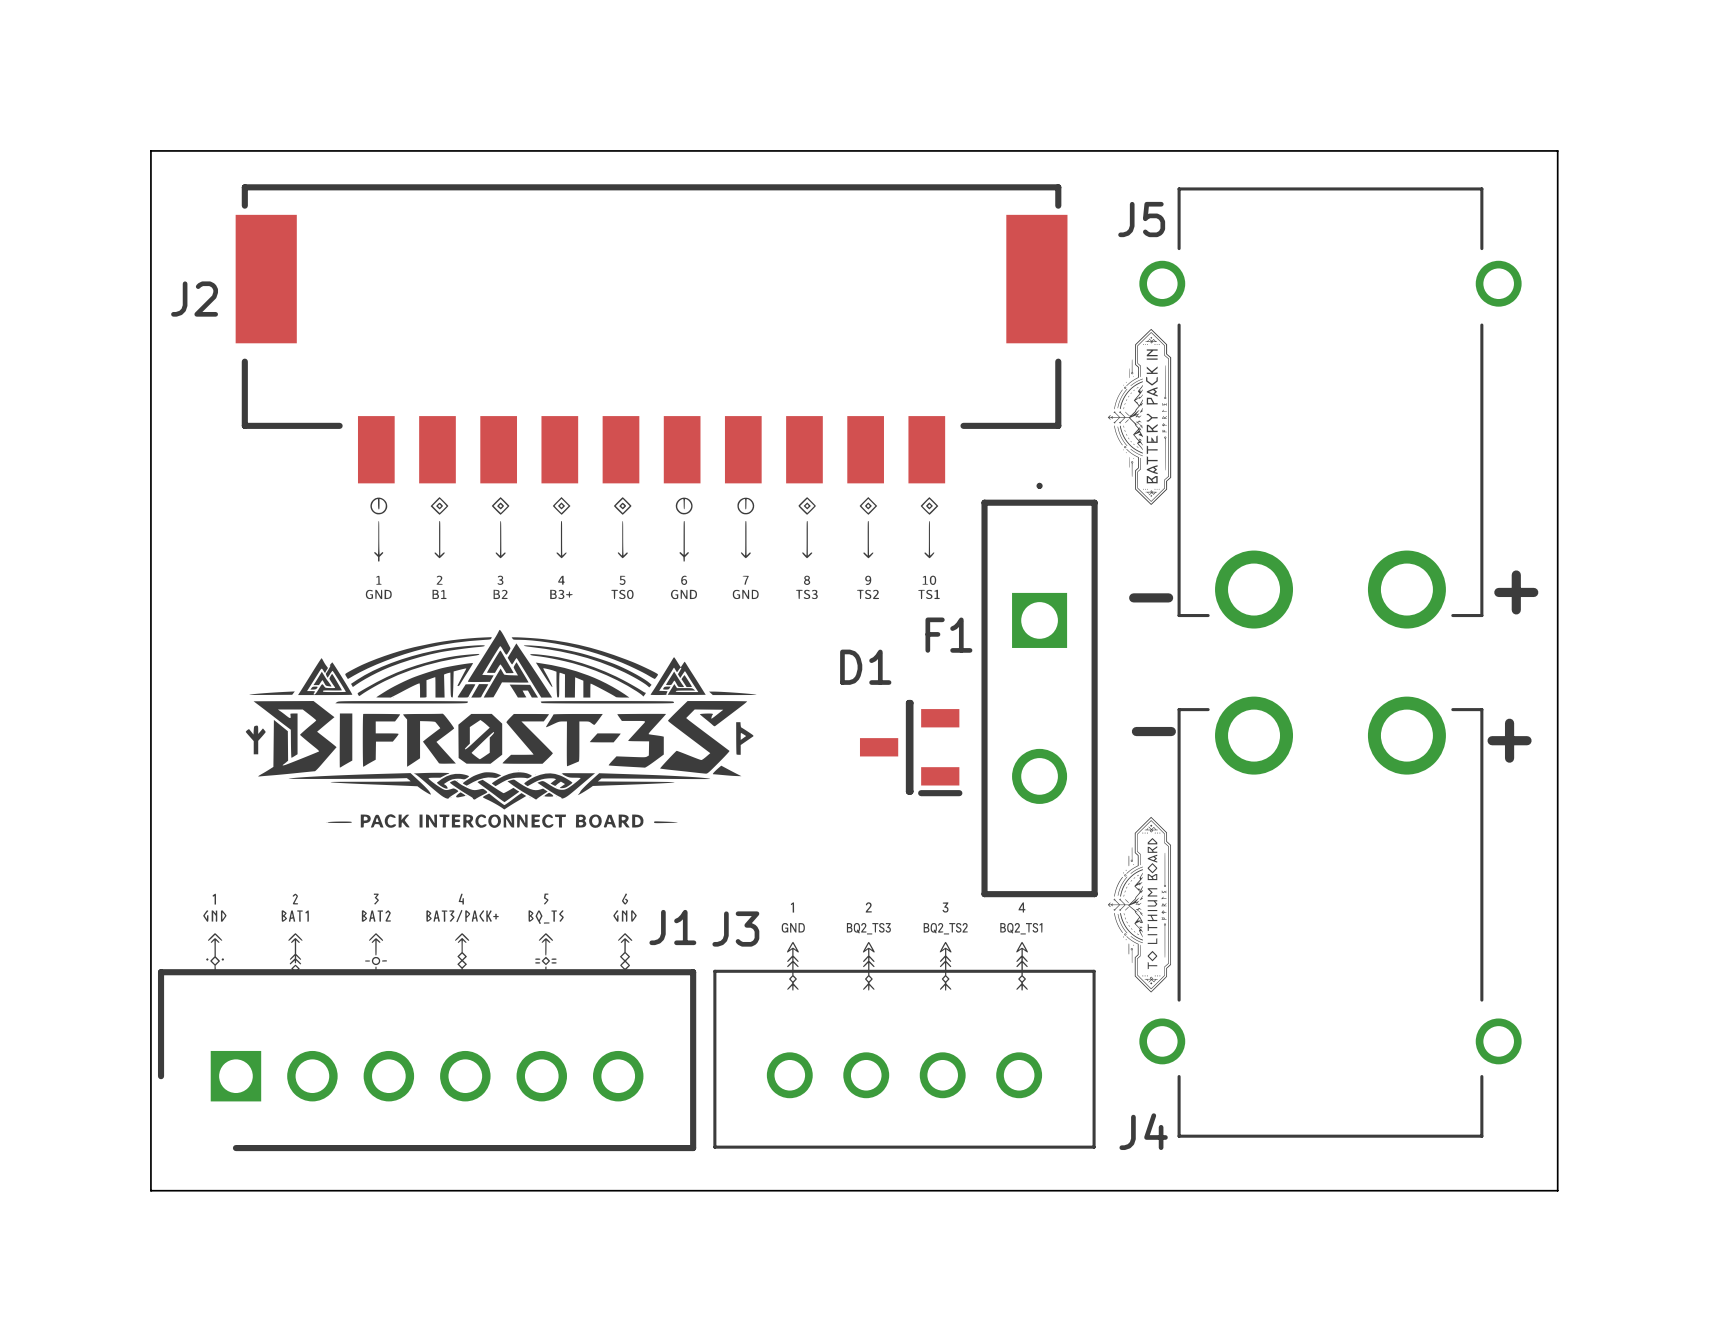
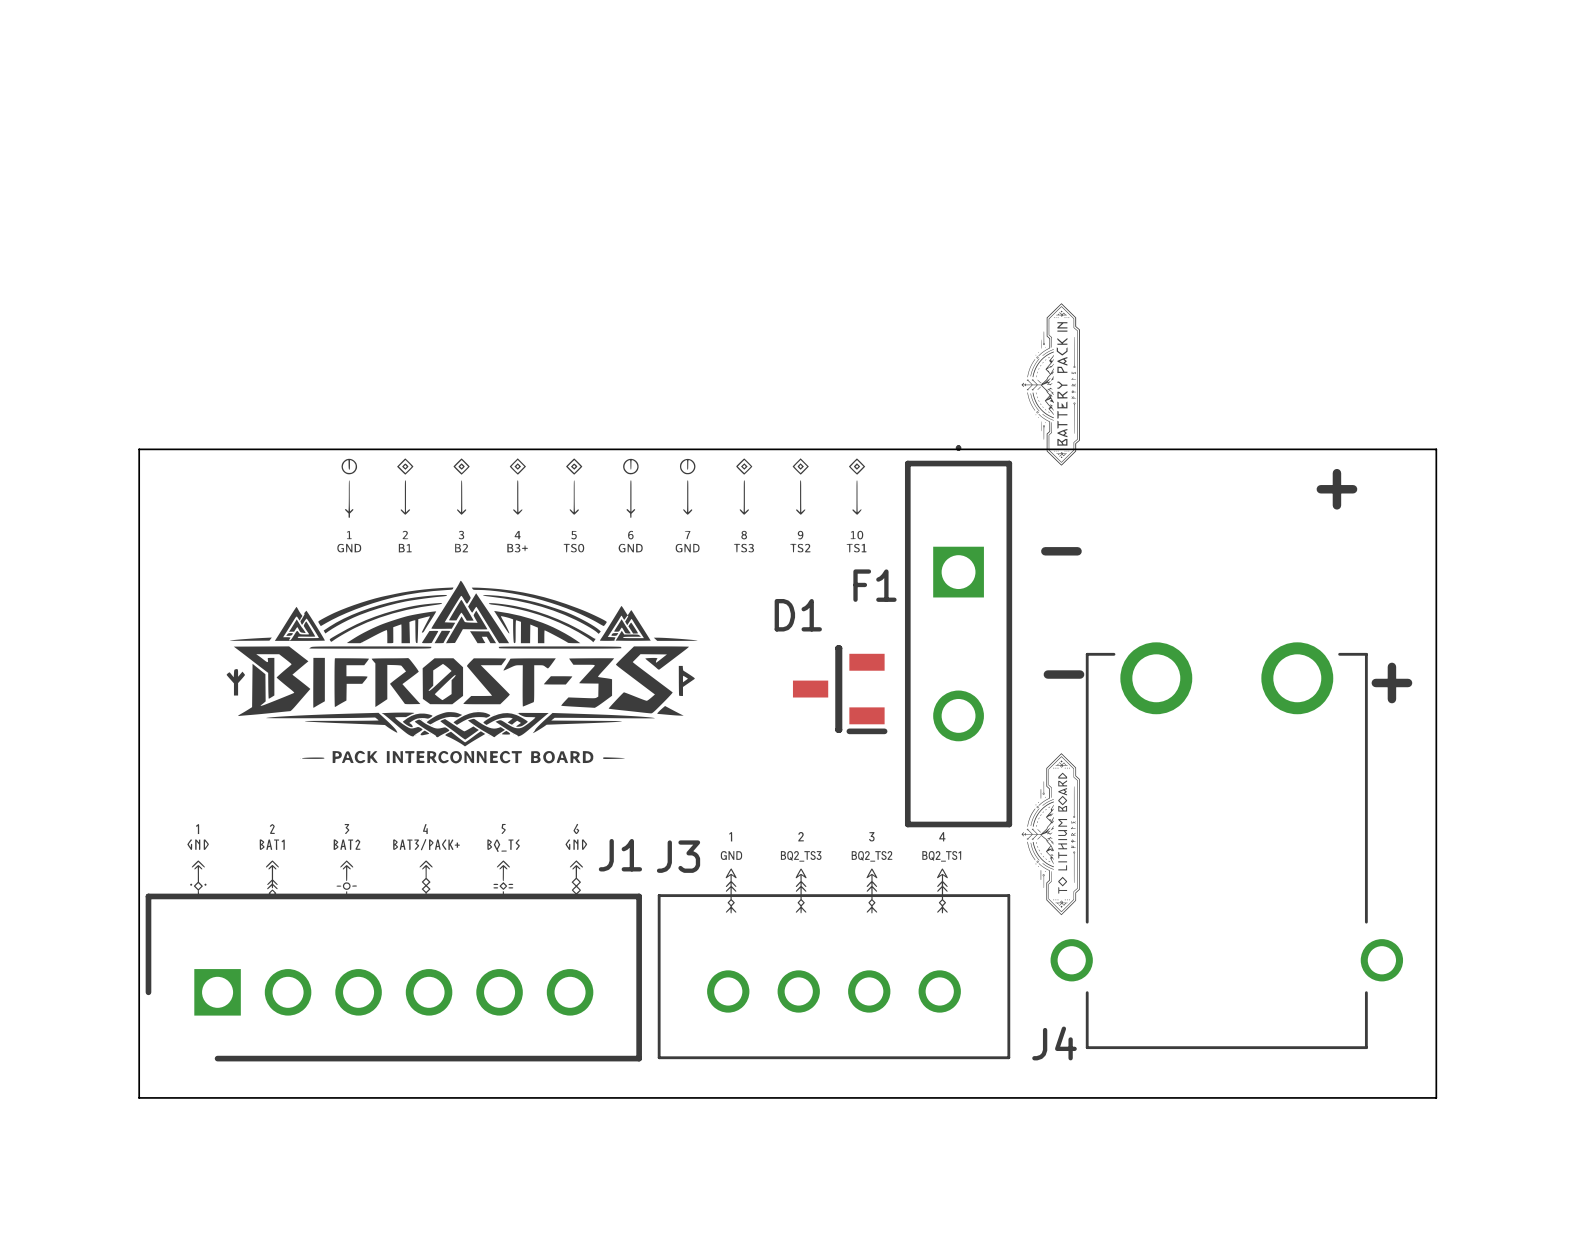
J2: (651, 333) -> none
J5: (1330, 407) -> none
board edge: (150, 487) (150, 150) (1557, 150) (1557, 487) -> (139, 449) (1436, 449)
text position: + (1516, 592) -> + (1336, 489)

